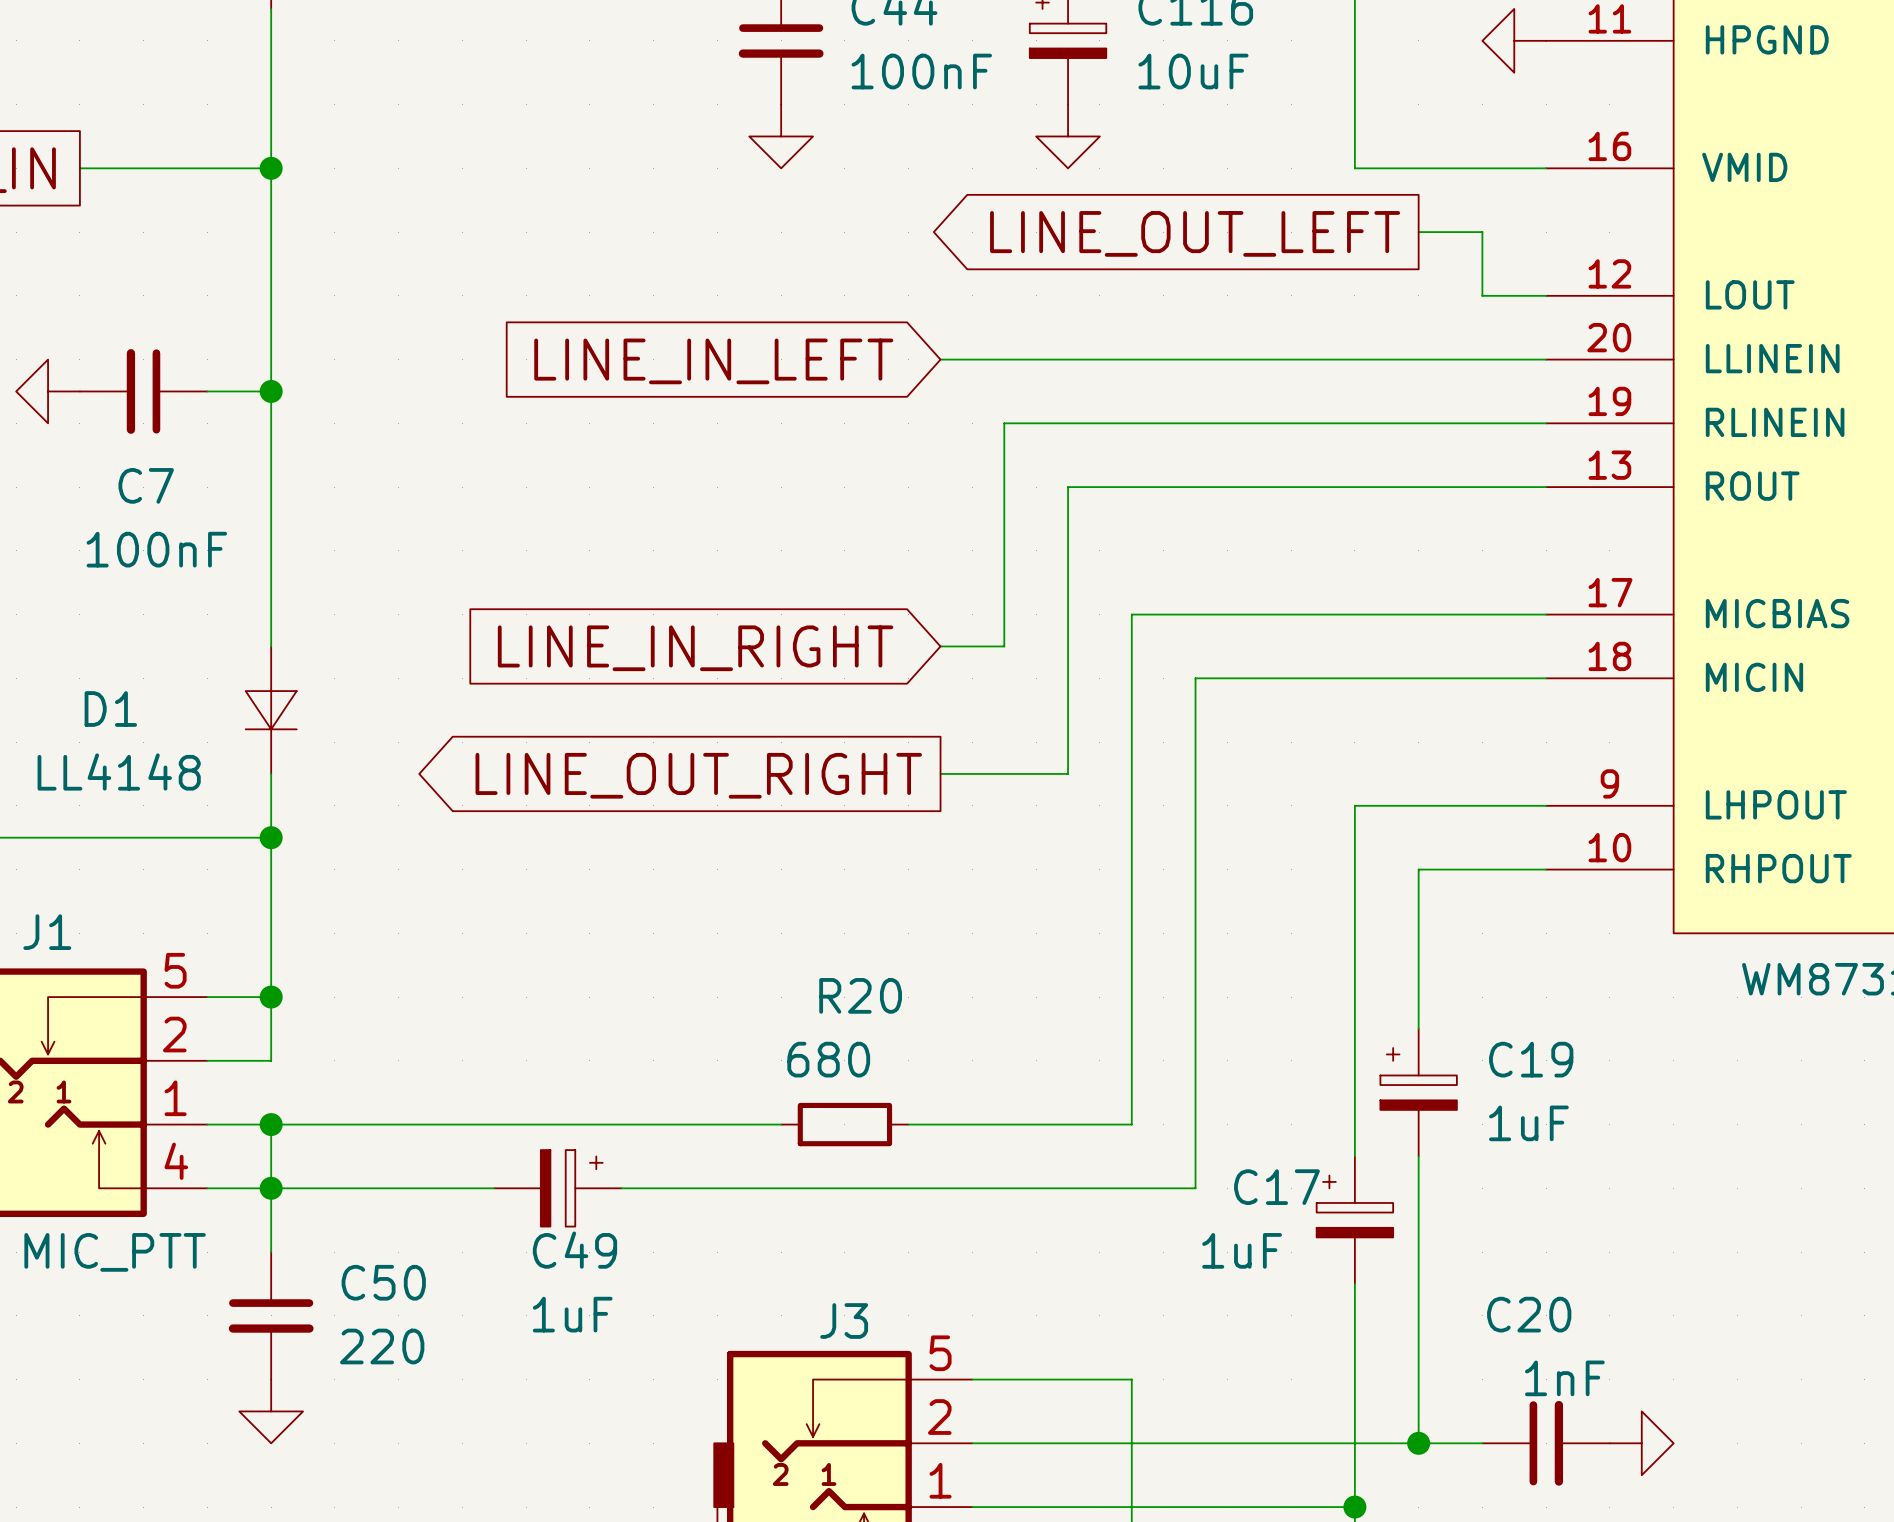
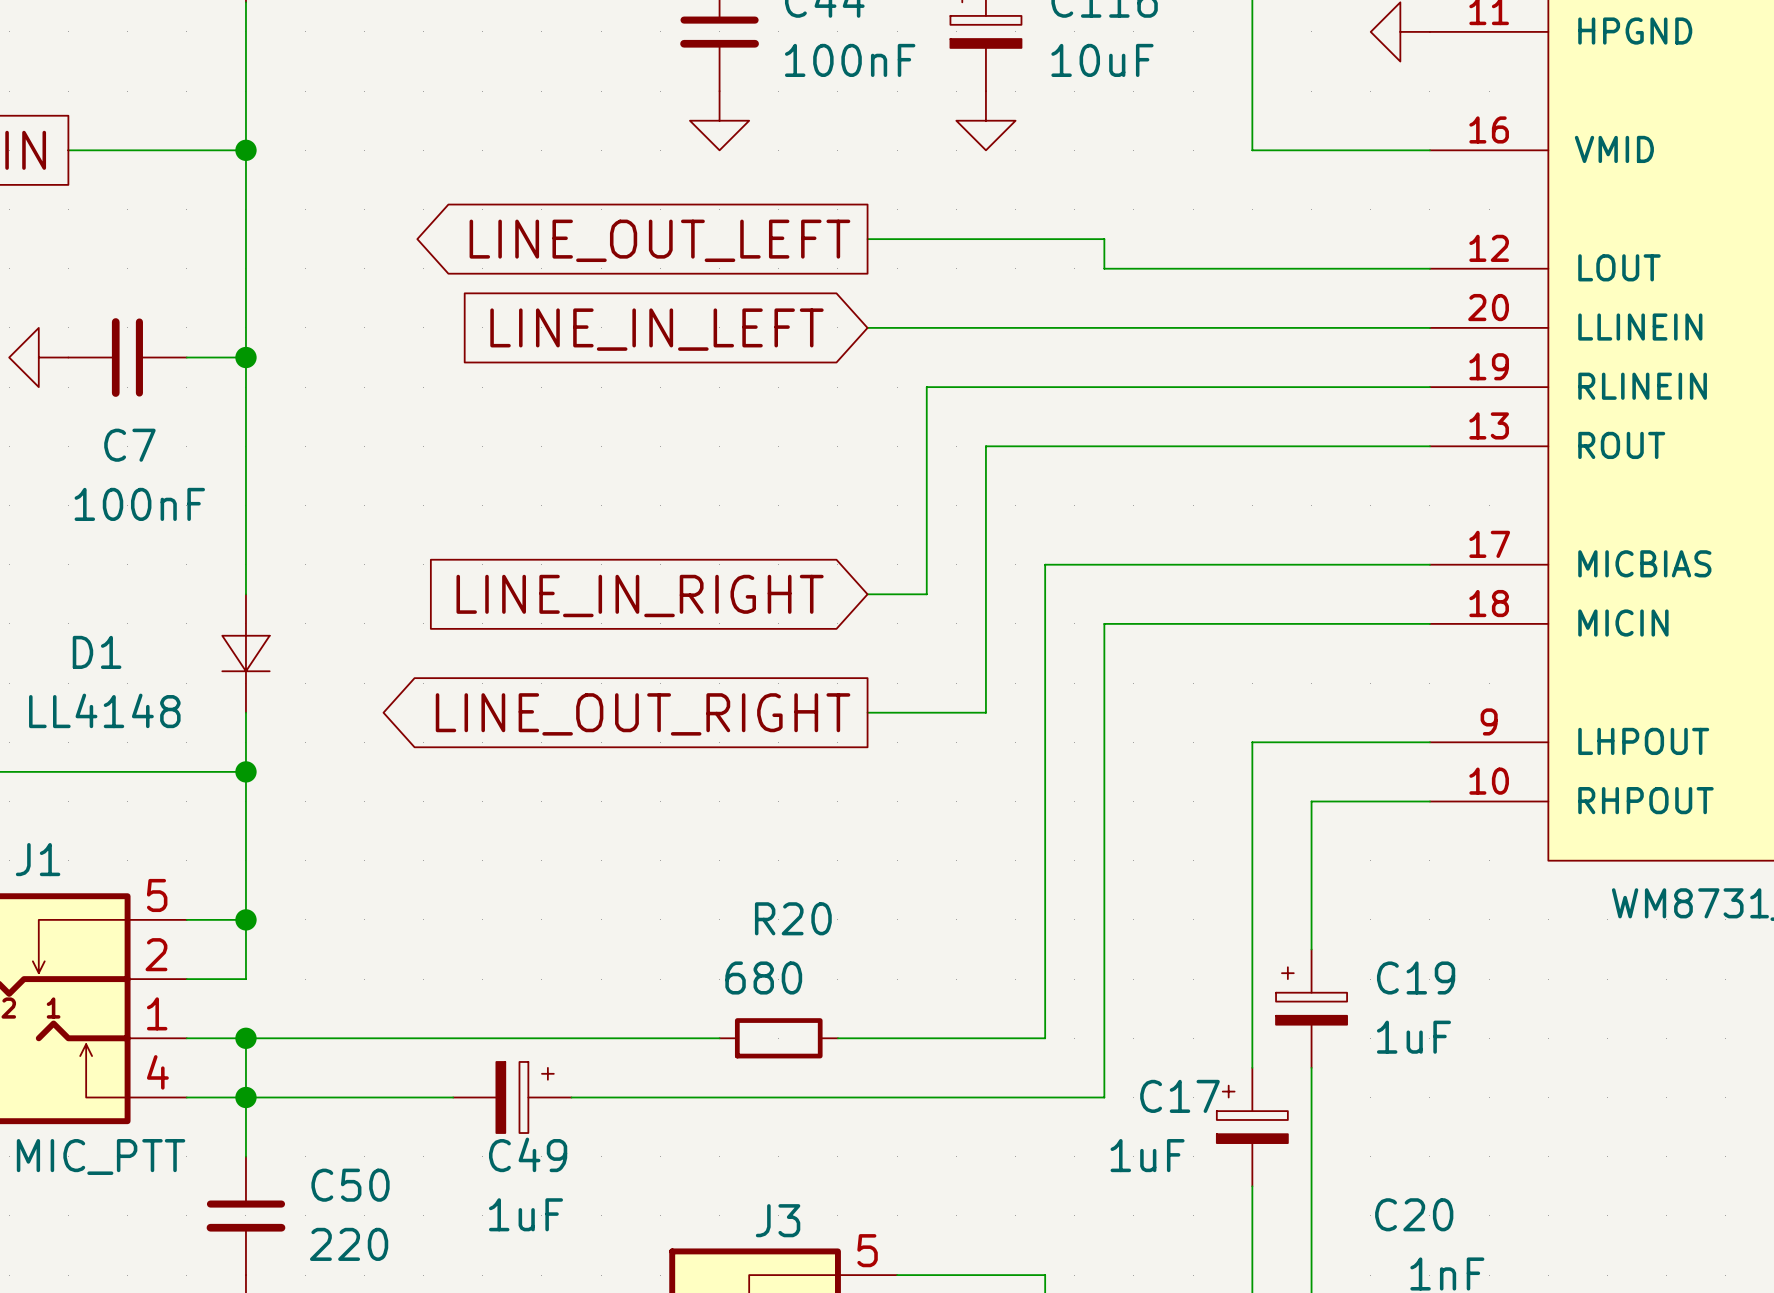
wire: (1418, 232) (1482, 232) (1482, 295) -> (867, 239) (1104, 239) (1104, 268) (1370, 268)
global label position: LINE_OUT_LEFT (1195, 233) -> LINE_OUT_LEFT (659, 240)

